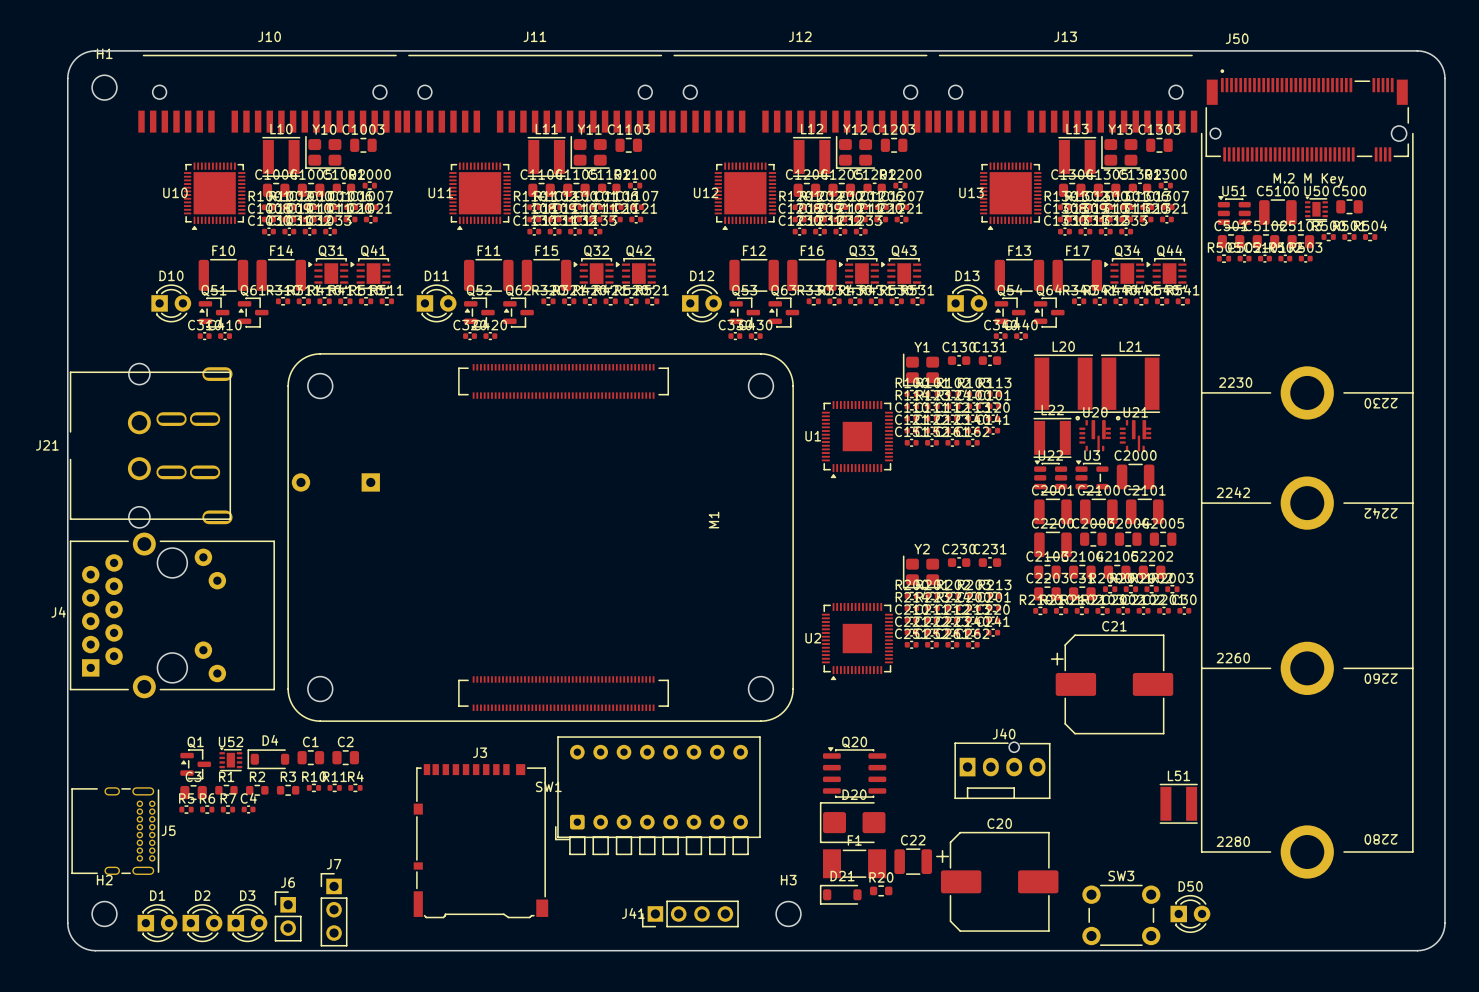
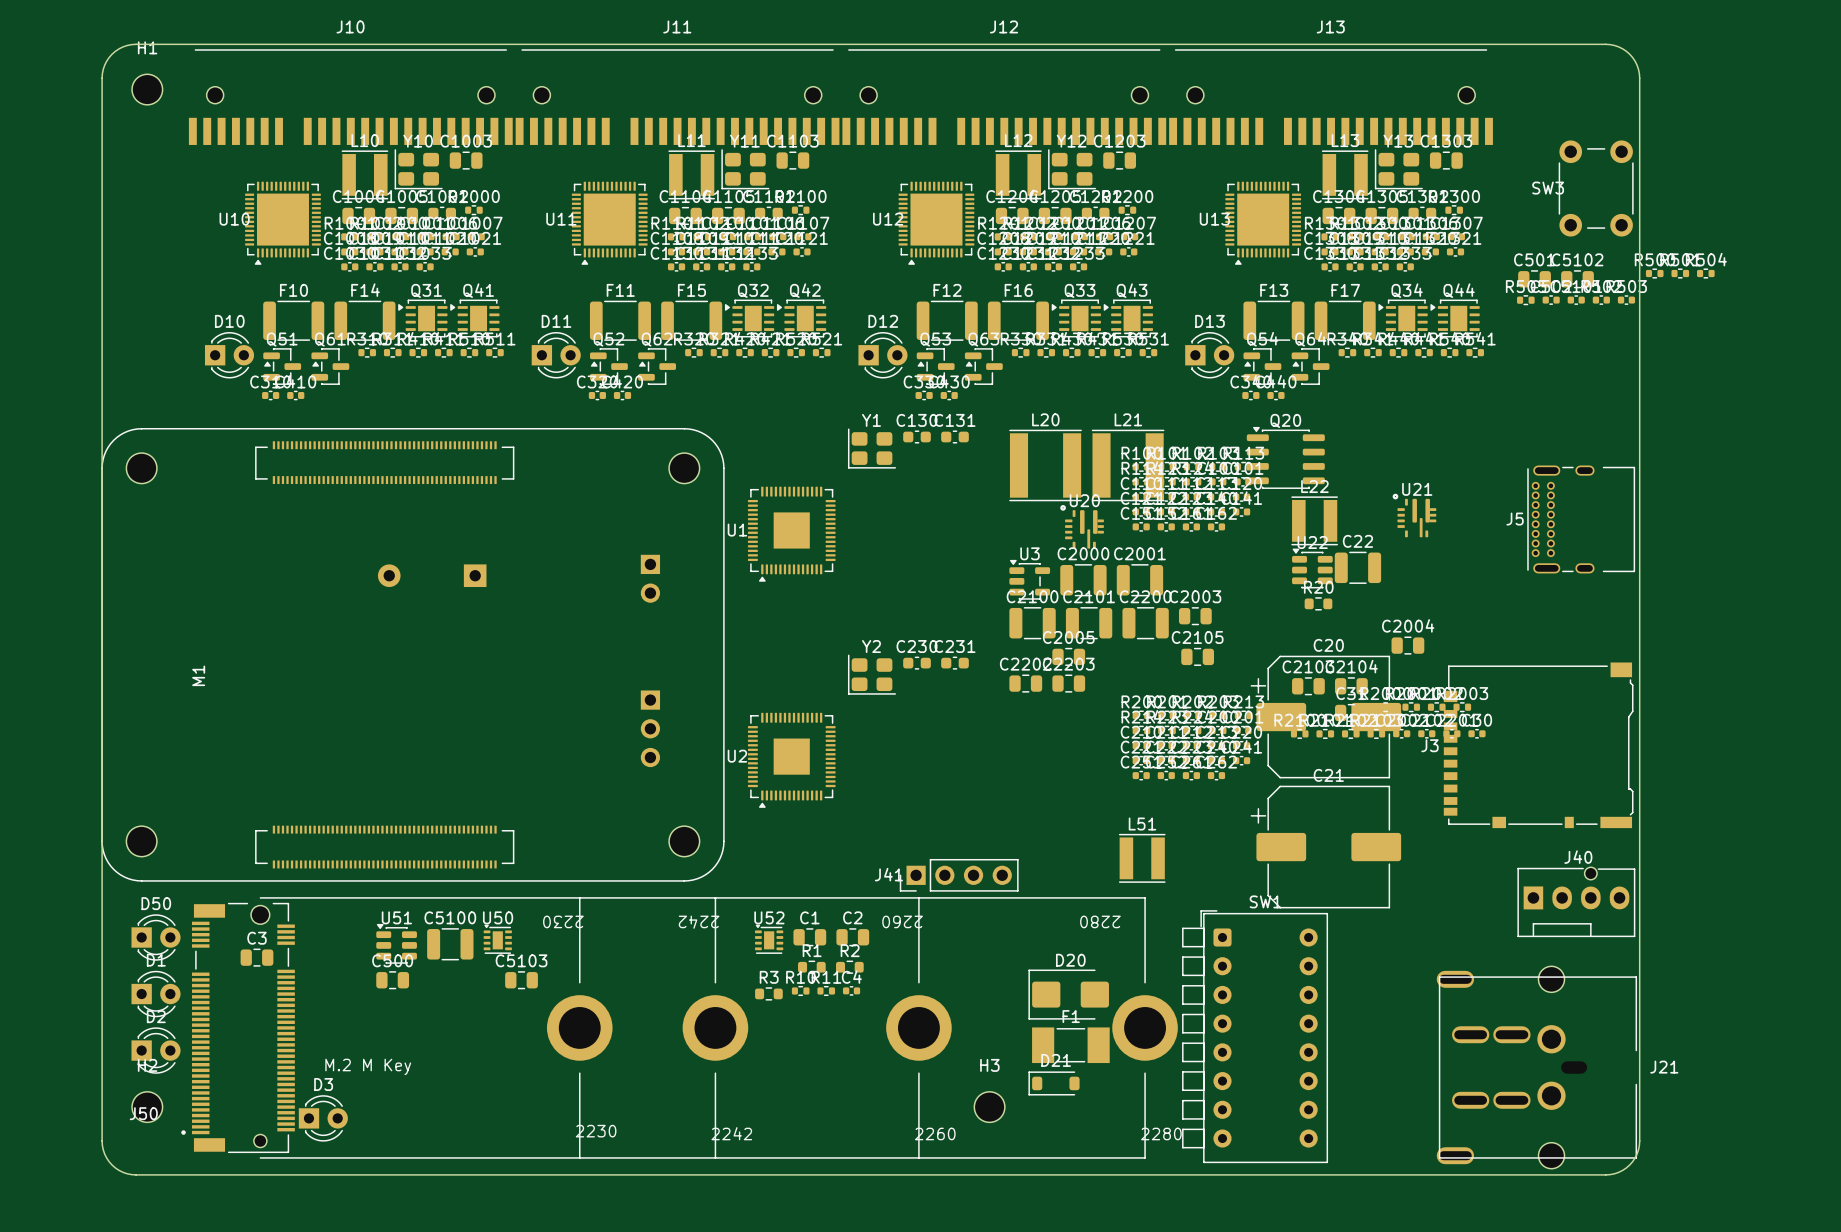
board edge: (1288, 50) (1421, 51) (1436, 58) (1444, 74) (1444, 923) (1442, 933) (1434, 945) (1417, 950) (95, 950) (84, 948) (75, 942) (69, 933) (67, 923) -> (1605, 44) (1618, 46) (1629, 54) (1637, 65) (1639, 78) (1639, 1141) (1635, 1157) (1626, 1167) (1618, 1172) (1605, 1174) (136, 1174) (119, 1170) (106, 1157) (102, 1145) (102, 1118)
C500 position: (1349, 206) -> (392, 980)
U50 position: (1316, 208) -> (497, 939)
U51 position: (1234, 212) -> (396, 943)
C5100 position: (1277, 212) -> (450, 944)
C5103 position: (1300, 241) -> (521, 980)
C130 position: (959, 360) -> (917, 436)
C131 position: (989, 360) -> (955, 436)
Y1 position: (922, 369) -> (872, 448)
L20 position: (1063, 383) -> (1045, 465)
L21 position: (1130, 383) -> (1128, 465)
U20 position: (1093, 433) -> (1082, 526)
U1 position: (857, 439) -> (791, 534)
J21 rotation: 0° (151, 445) -> 180° (1536, 1067)
J21 position: (151, 445) -> (1536, 1067)
J50 rotation: 0° (1307, 473) -> 90° counterclockwise (679, 1027)
J50 position: (1307, 473) -> (679, 1027)
U3 position: (1091, 476) -> (1029, 579)
C2000 position: (1135, 476) -> (1083, 580)
part: none -> (650, 578)
C2001 position: (1052, 511) -> (1139, 580)
C2100 position: (1098, 511) -> (1032, 623)
C2101 position: (1144, 511) -> (1089, 623)
M1 rotation: 0° (540, 537) -> 180° (413, 654)
C2003 position: (1093, 539) -> (1195, 616)
C2005 position: (1163, 539) -> (1068, 656)
C2200 position: (1052, 544) -> (1145, 623)
C230 position: (959, 562) -> (917, 663)
C231 position: (989, 562) -> (955, 663)
Y2 position: (922, 571) -> (872, 674)
C2105 position: (1117, 572) -> (1197, 656)
C2202 position: (1152, 572) -> (1025, 683)
C2203 position: (1047, 593) -> (1068, 683)
part: none -> (650, 728)
J4: (172, 615) -> none
U2 position: (857, 641) -> (791, 760)
C21 position: (1112, 684) -> (1325, 847)
C1 position: (310, 757) -> (809, 937)
C2 position: (345, 757) -> (852, 937)
U52 position: (230, 759) -> (769, 939)
D4: (268, 759) -> none
Q1: (195, 764) -> none
J40 position: (1002, 770) -> (1576, 902)
Q20 position: (854, 772) -> (1285, 457)
R10 position: (313, 787) -> (800, 990)
R11 position: (334, 787) -> (826, 990)
R4: (355, 787) -> none
R1 position: (226, 790) -> (811, 967)
R2 position: (257, 790) -> (849, 967)
R3 position: (288, 790) -> (768, 993)
SW1 rotation: 0° (657, 795) -> 90° clockwise (1255, 1036)
SW1 position: (657, 795) -> (1255, 1036)
L51 position: (1178, 803) -> (1142, 858)
R5: (186, 809) -> none
R6: (207, 809) -> none
R7: (228, 809) -> none
C4 position: (248, 809) -> (851, 990)
J5 rotation: 0° (115, 831) -> 180° (1581, 519)
J5 position: (115, 831) -> (1581, 519)
J3 rotation: 0° (480, 841) -> 90° counterclockwise (1538, 745)
J3 position: (480, 841) -> (1538, 745)
C22 position: (913, 861) -> (1357, 567)
SW3 name position: SW3 (1121, 875) -> SW3 (1548, 188)
C20 position: (997, 881) -> (1325, 717)
R20 position: (881, 890) -> (1318, 603)
J7: (334, 909) -> none
J41 position: (690, 913) -> (959, 875)
D50 position: (1190, 913) -> (156, 937)
SW3 rotation: 0° (1121, 915) -> 90° clockwise (1596, 188)
SW3 position: (1121, 915) -> (1596, 188)
J6: (288, 916) -> none
D1 position: (157, 923) -> (156, 994)
D2 position: (202, 923) -> (156, 1050)

